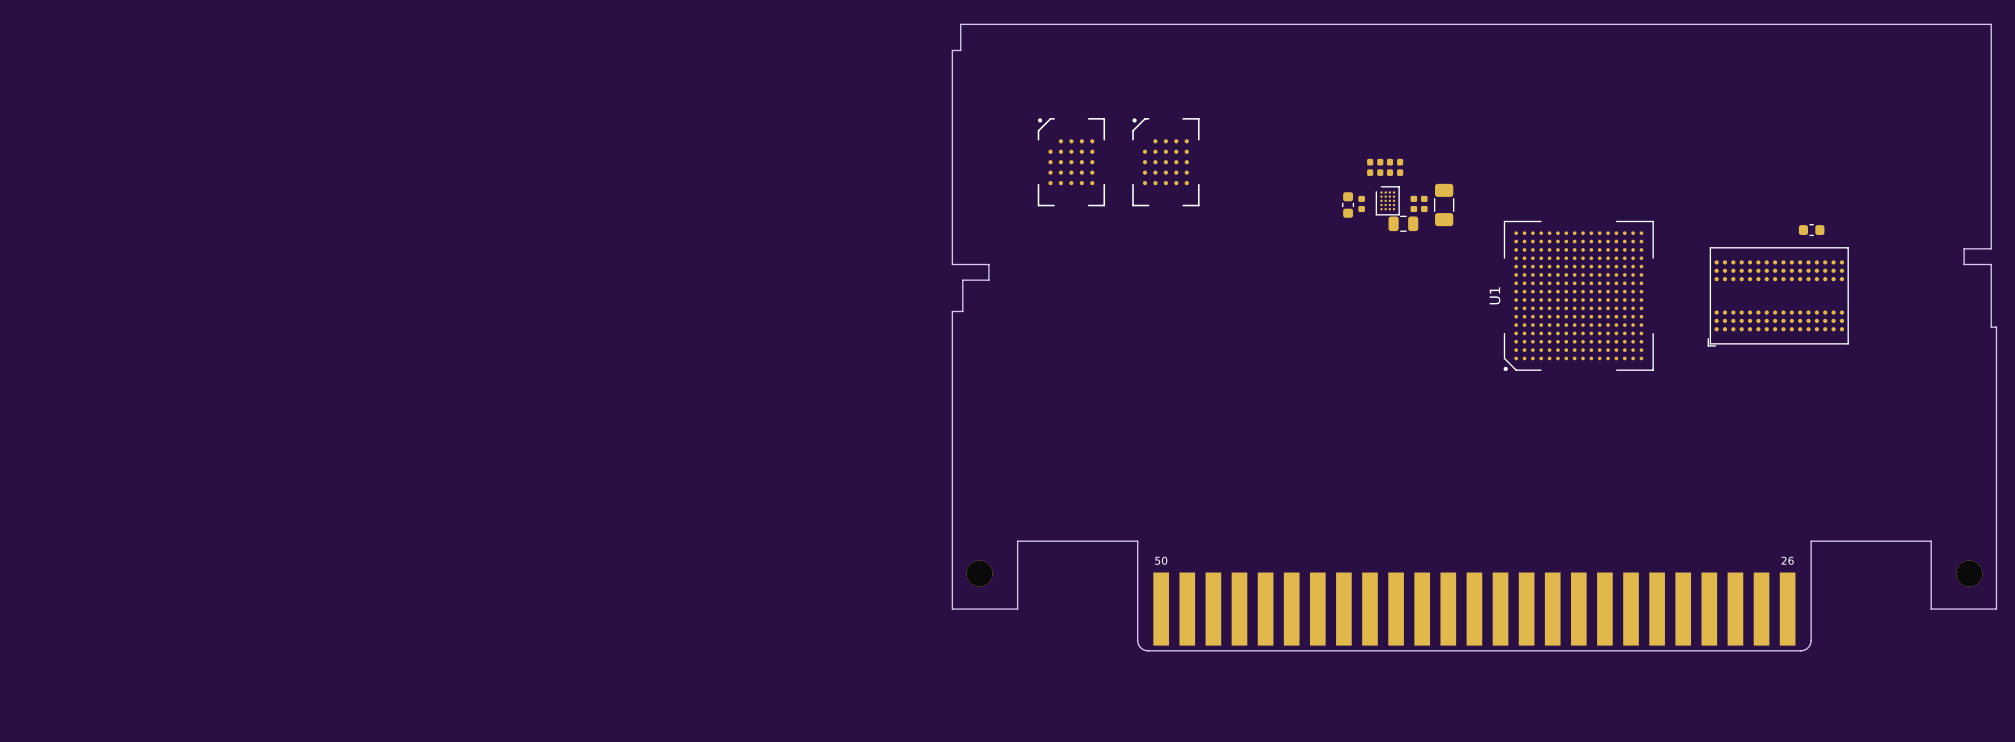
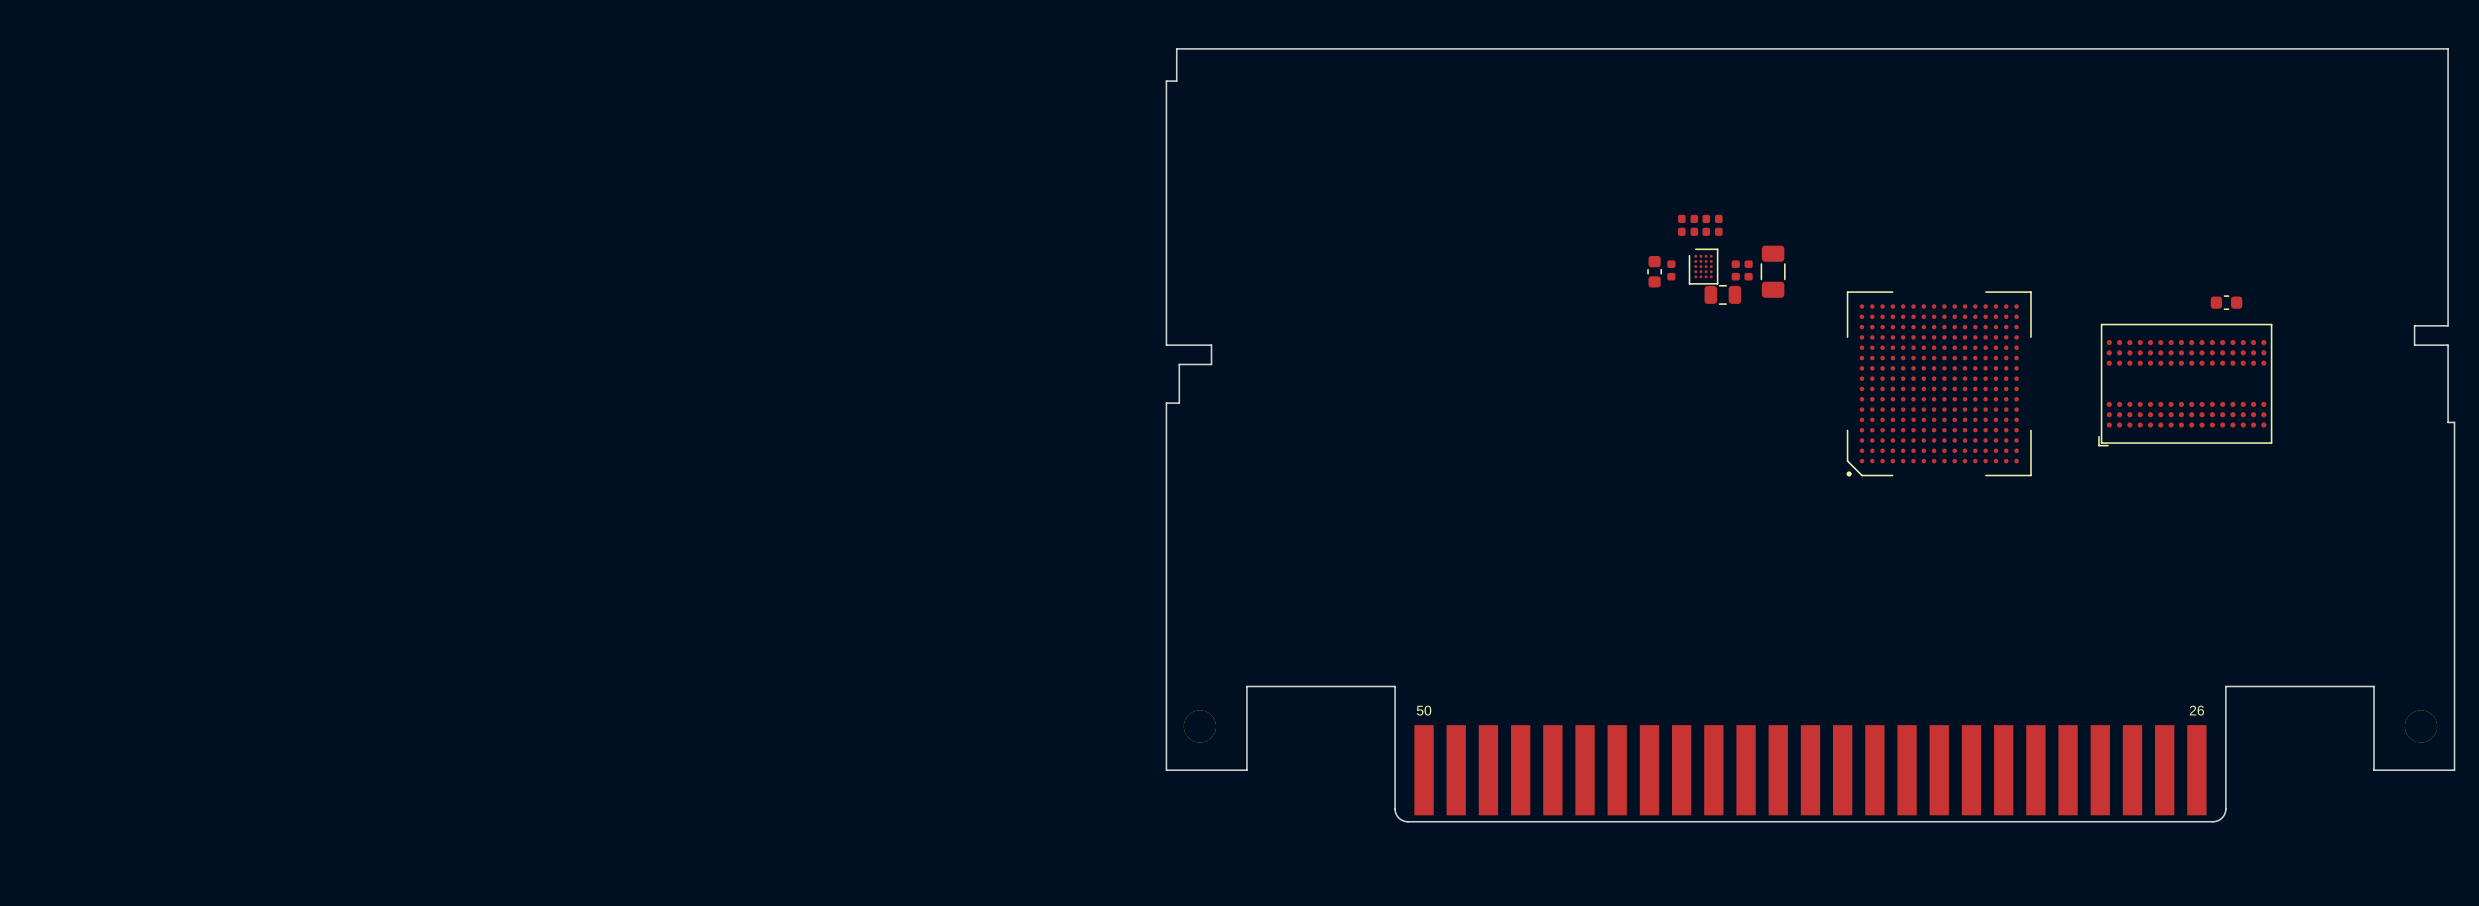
part: (1071, 162) -> none
part: (1165, 162) -> none
U1 name: U1 (1495, 295) -> none

